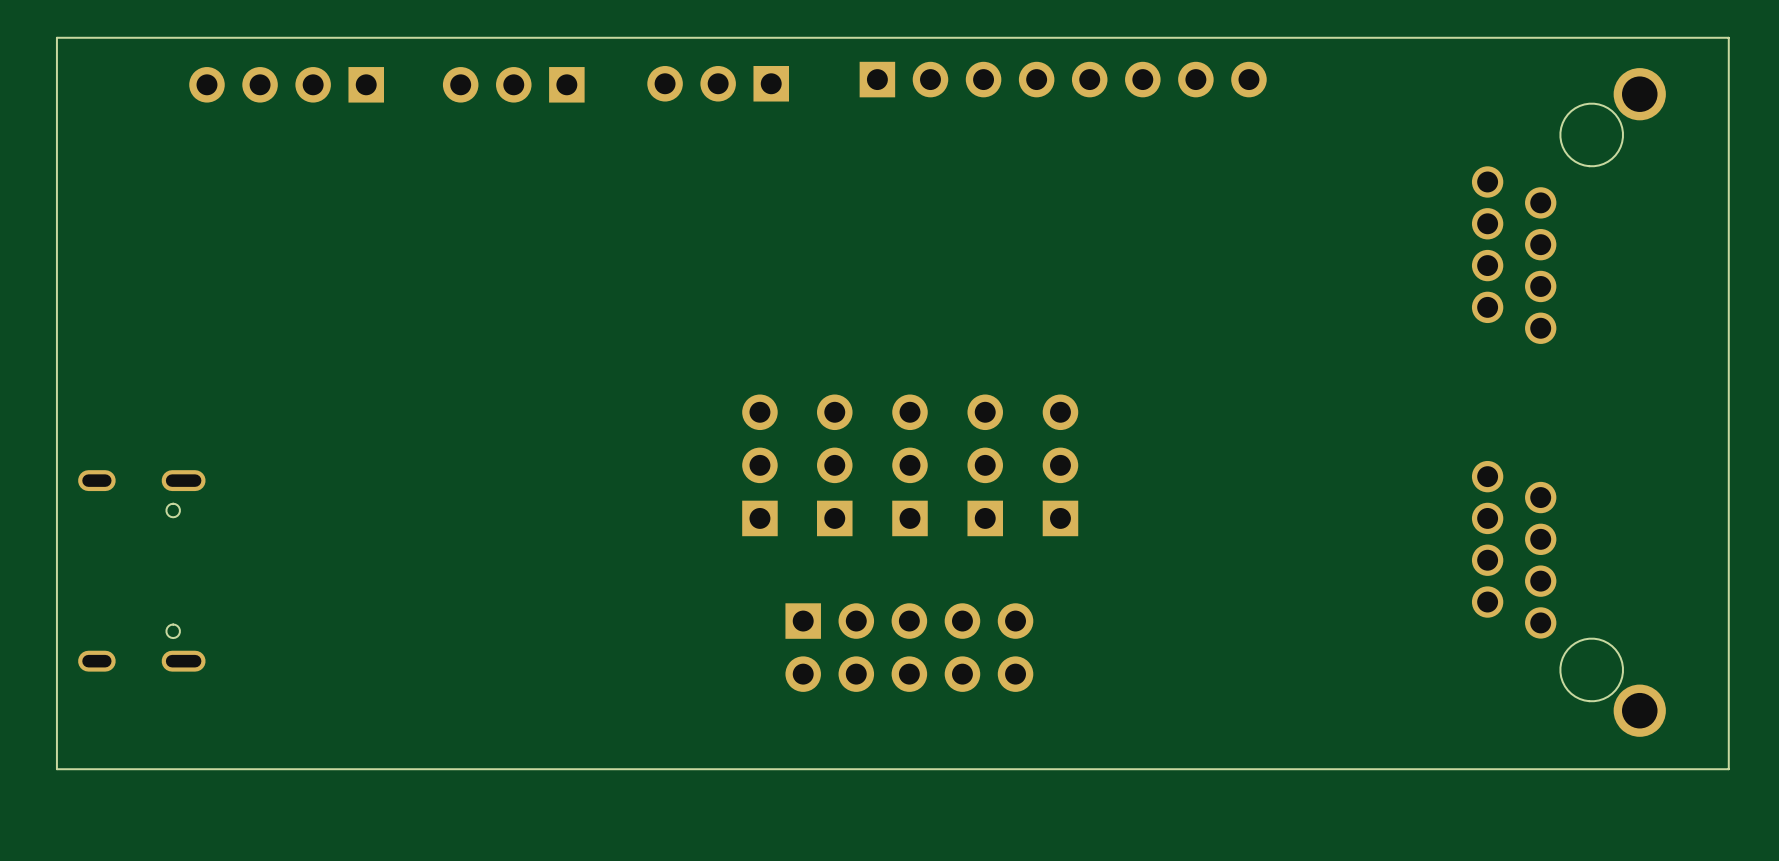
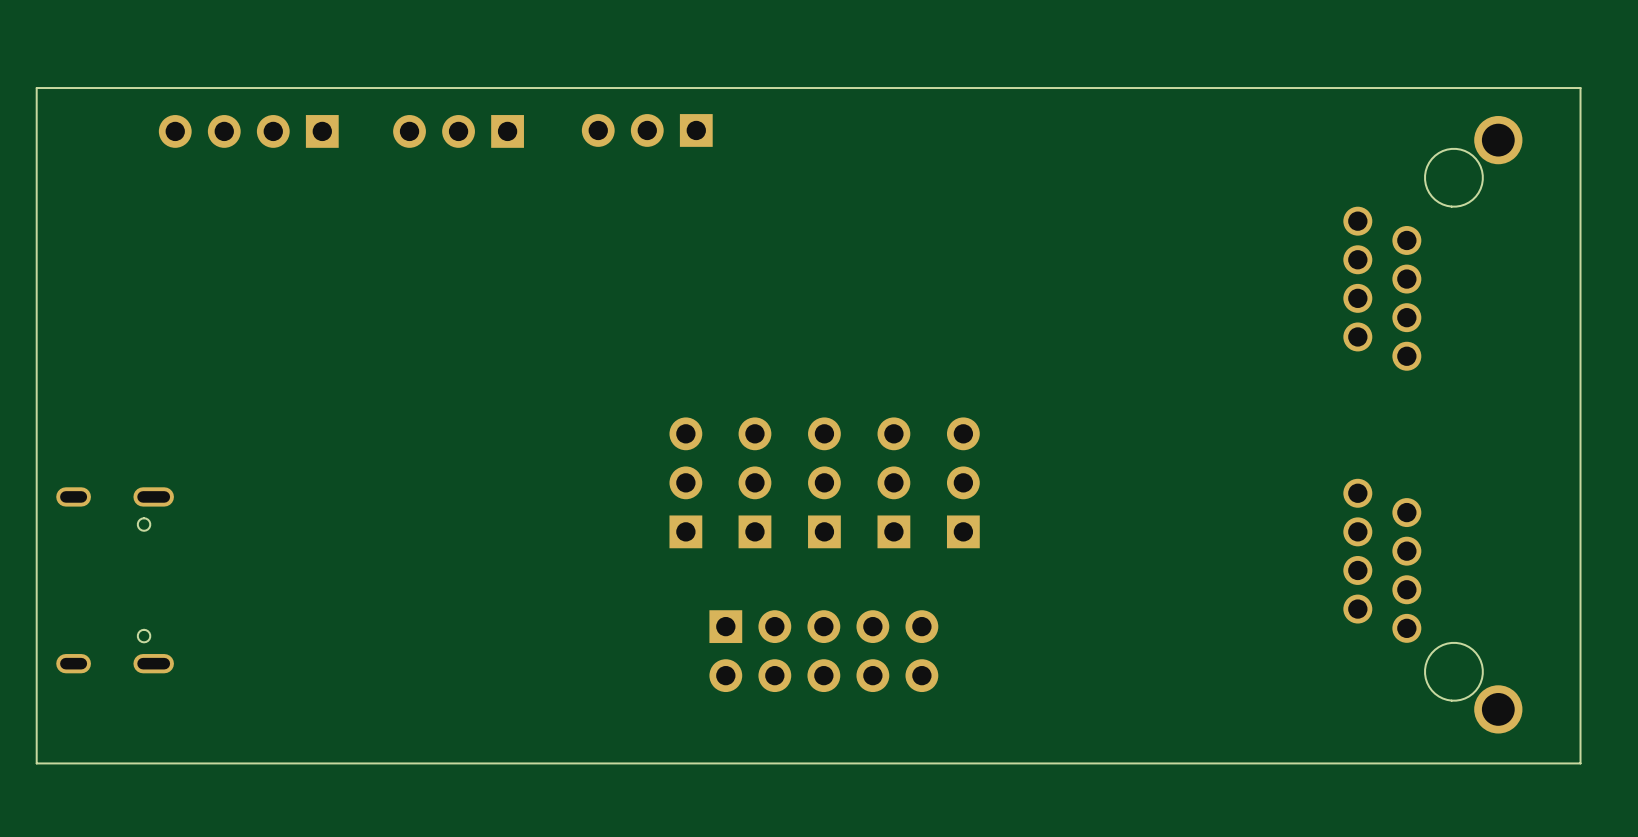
part: (1063, 79) -> none

